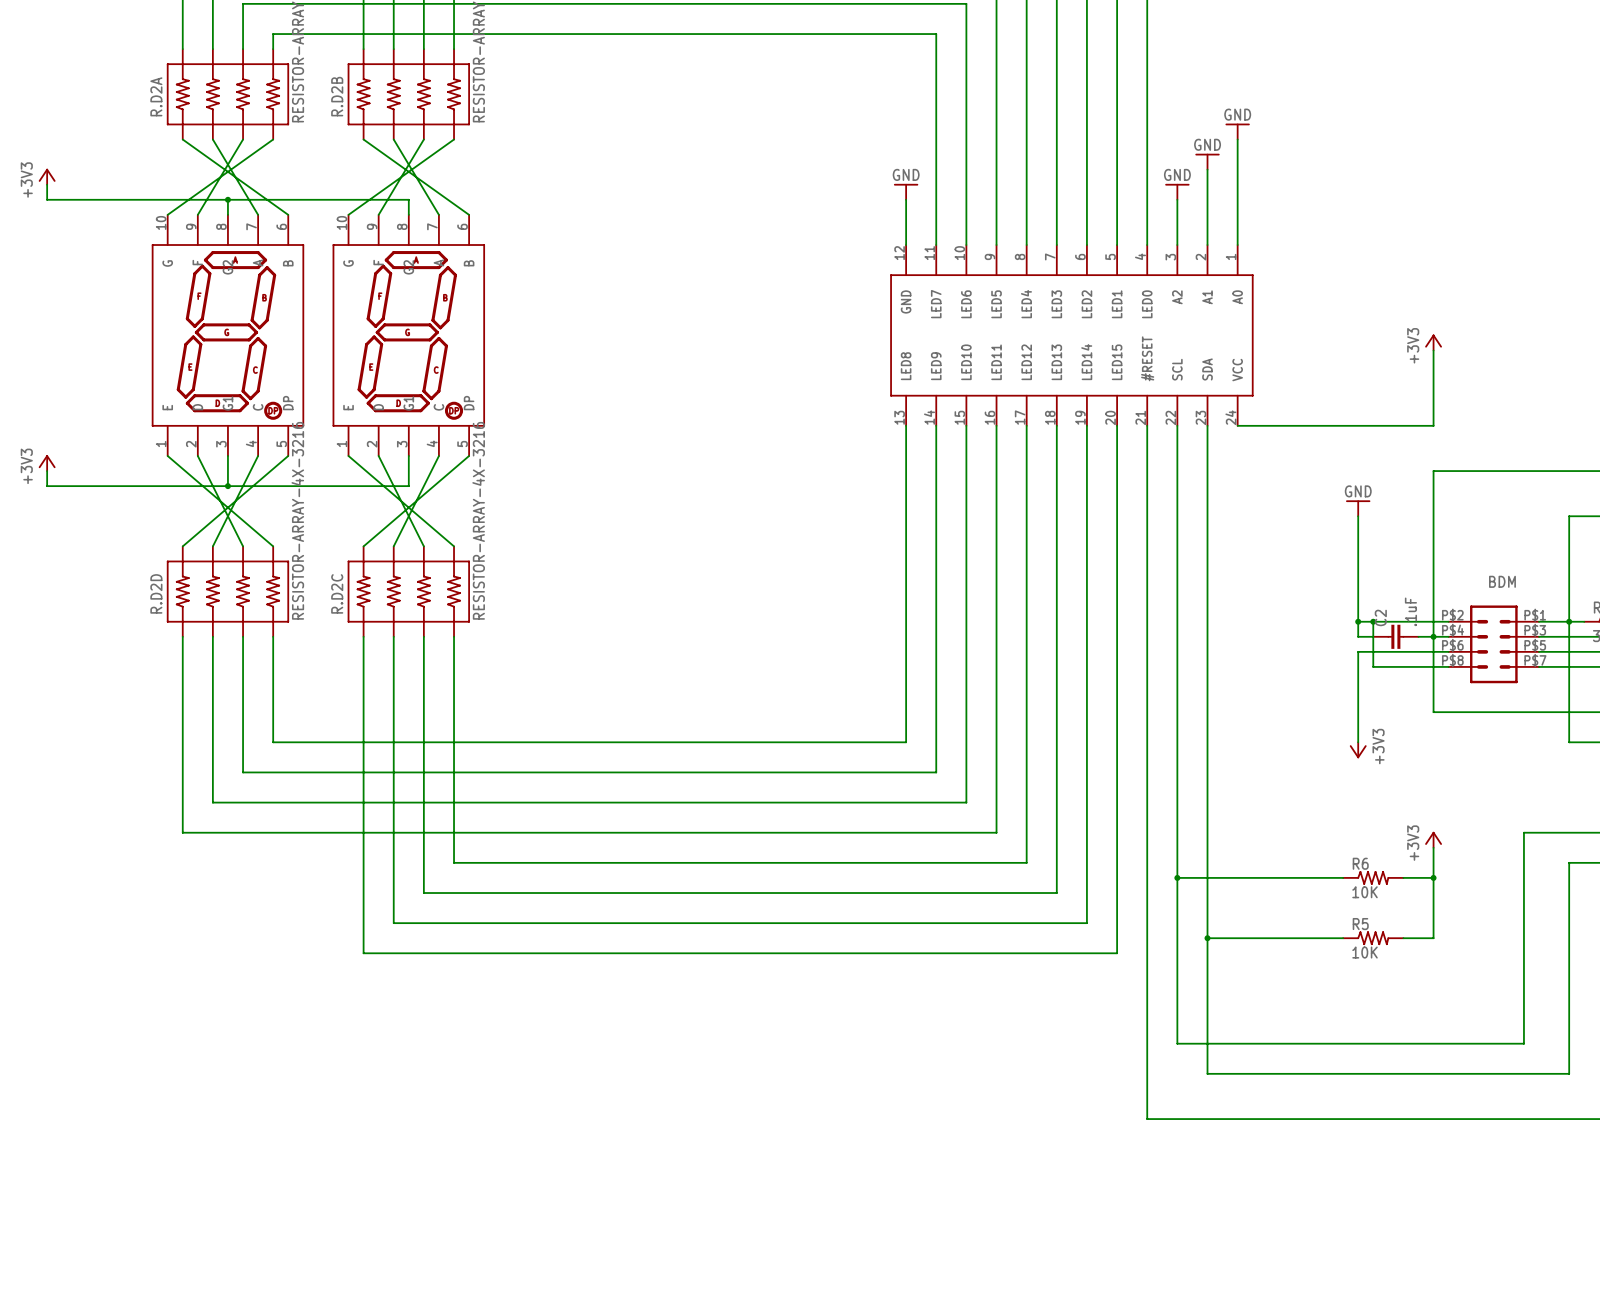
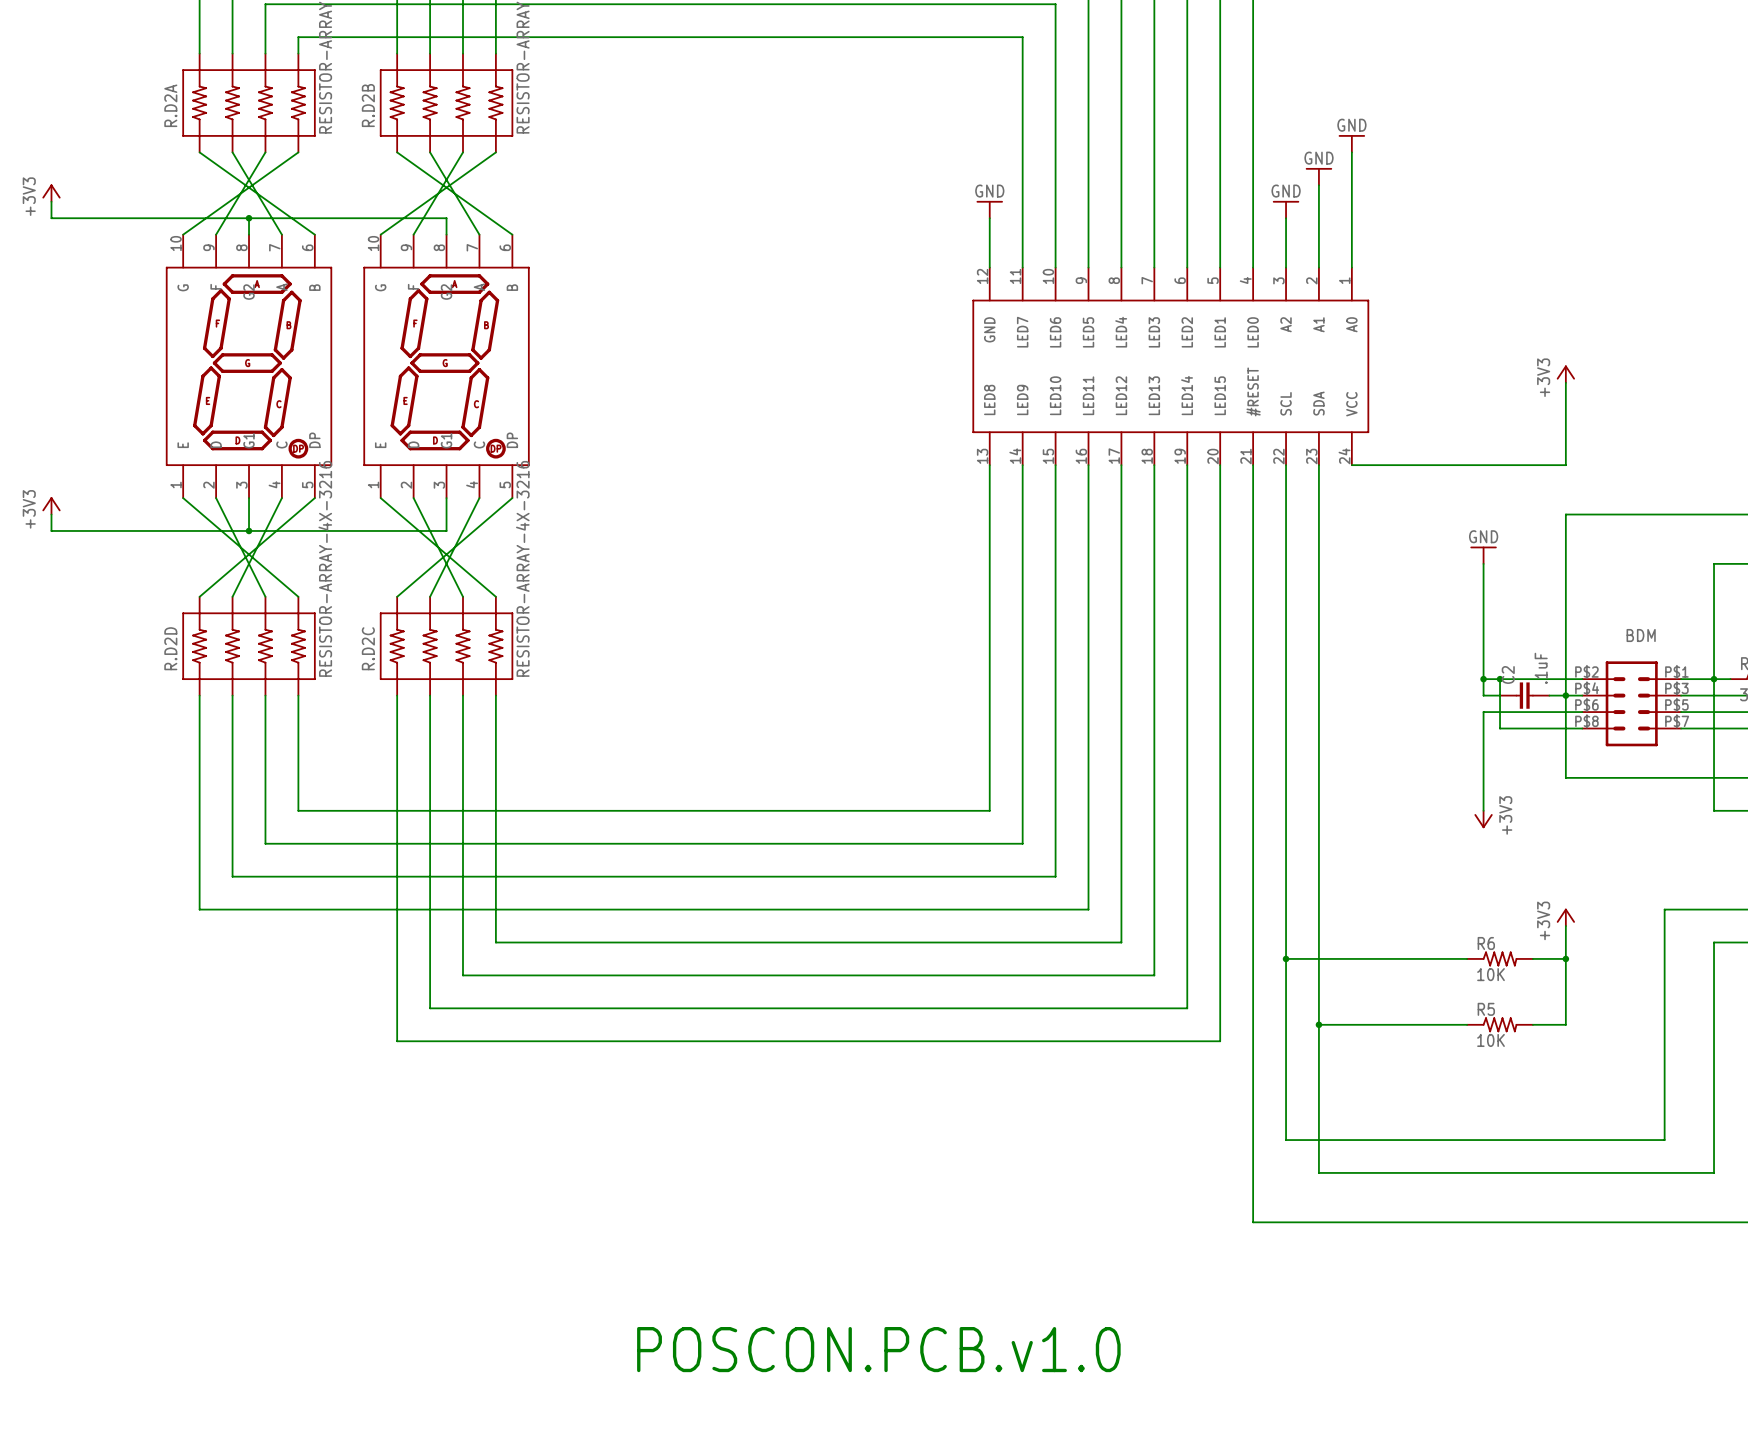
text: none -> POSCON.PCB.v1.0 (878, 1349)

